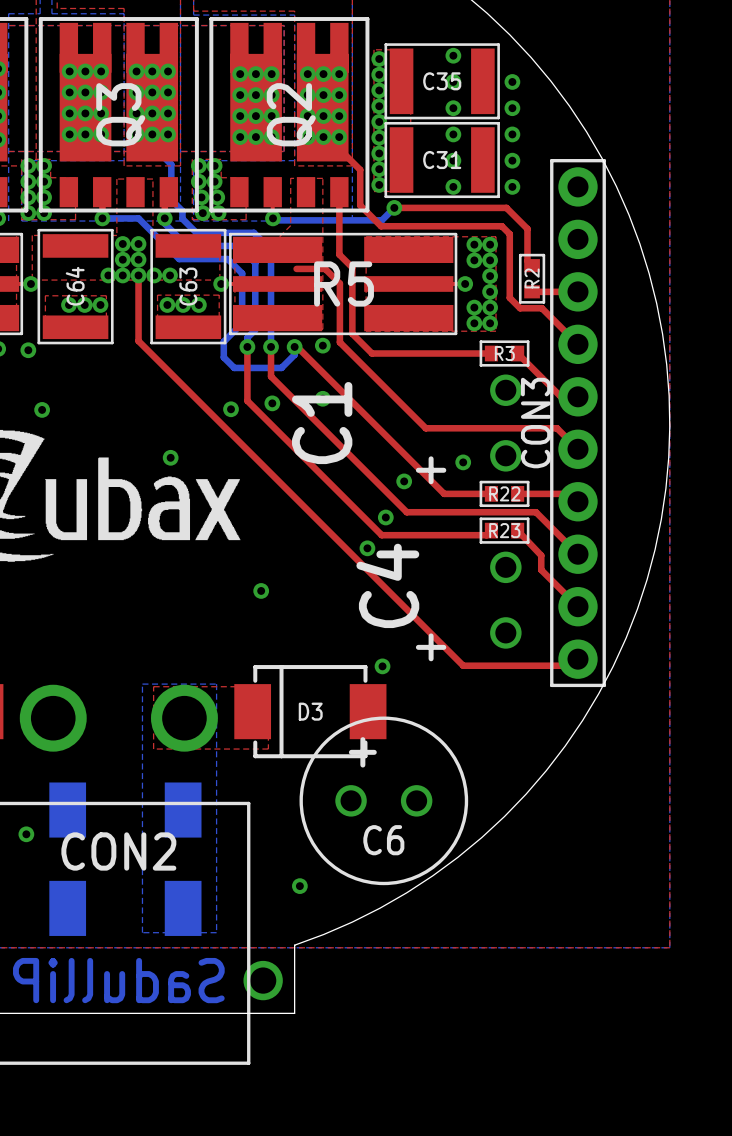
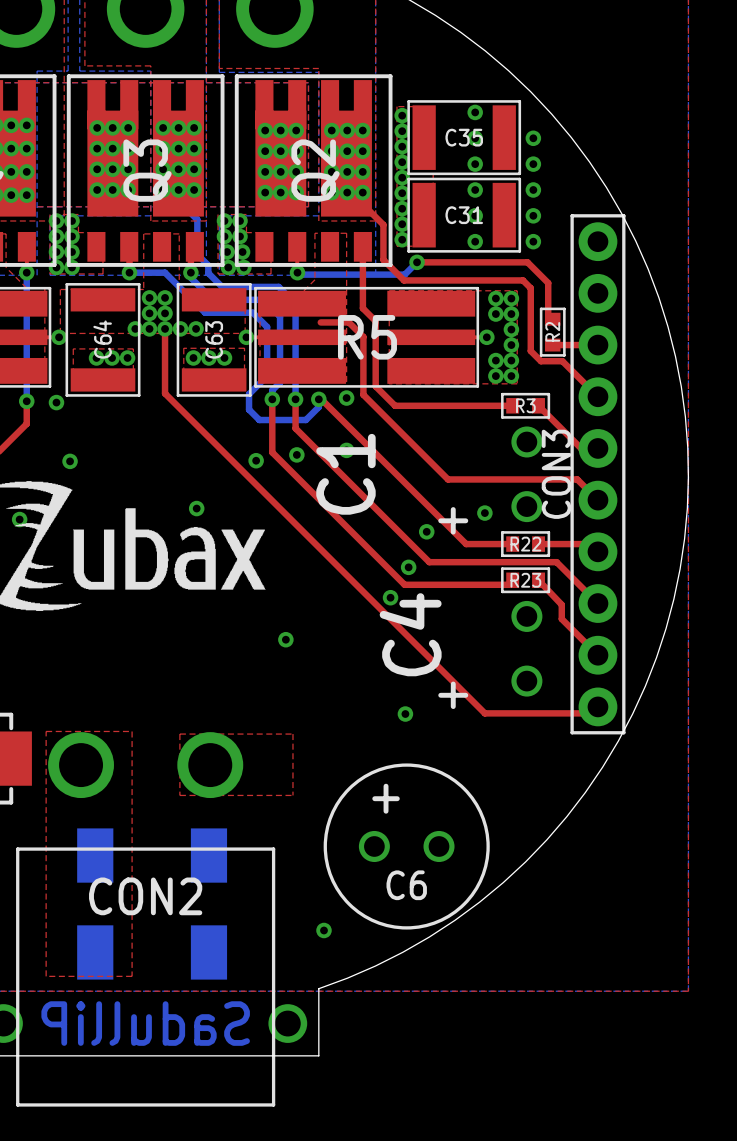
top zone outline: none -> (46, 731) (46, 976) (132, 976) (132, 731) (46, 731)
bottom zone outline: (142, 684) (142, 932) (216, 932) (216, 684) (142, 684) -> none
D3: (310, 711) -> none
via: (26, 834) -> none

